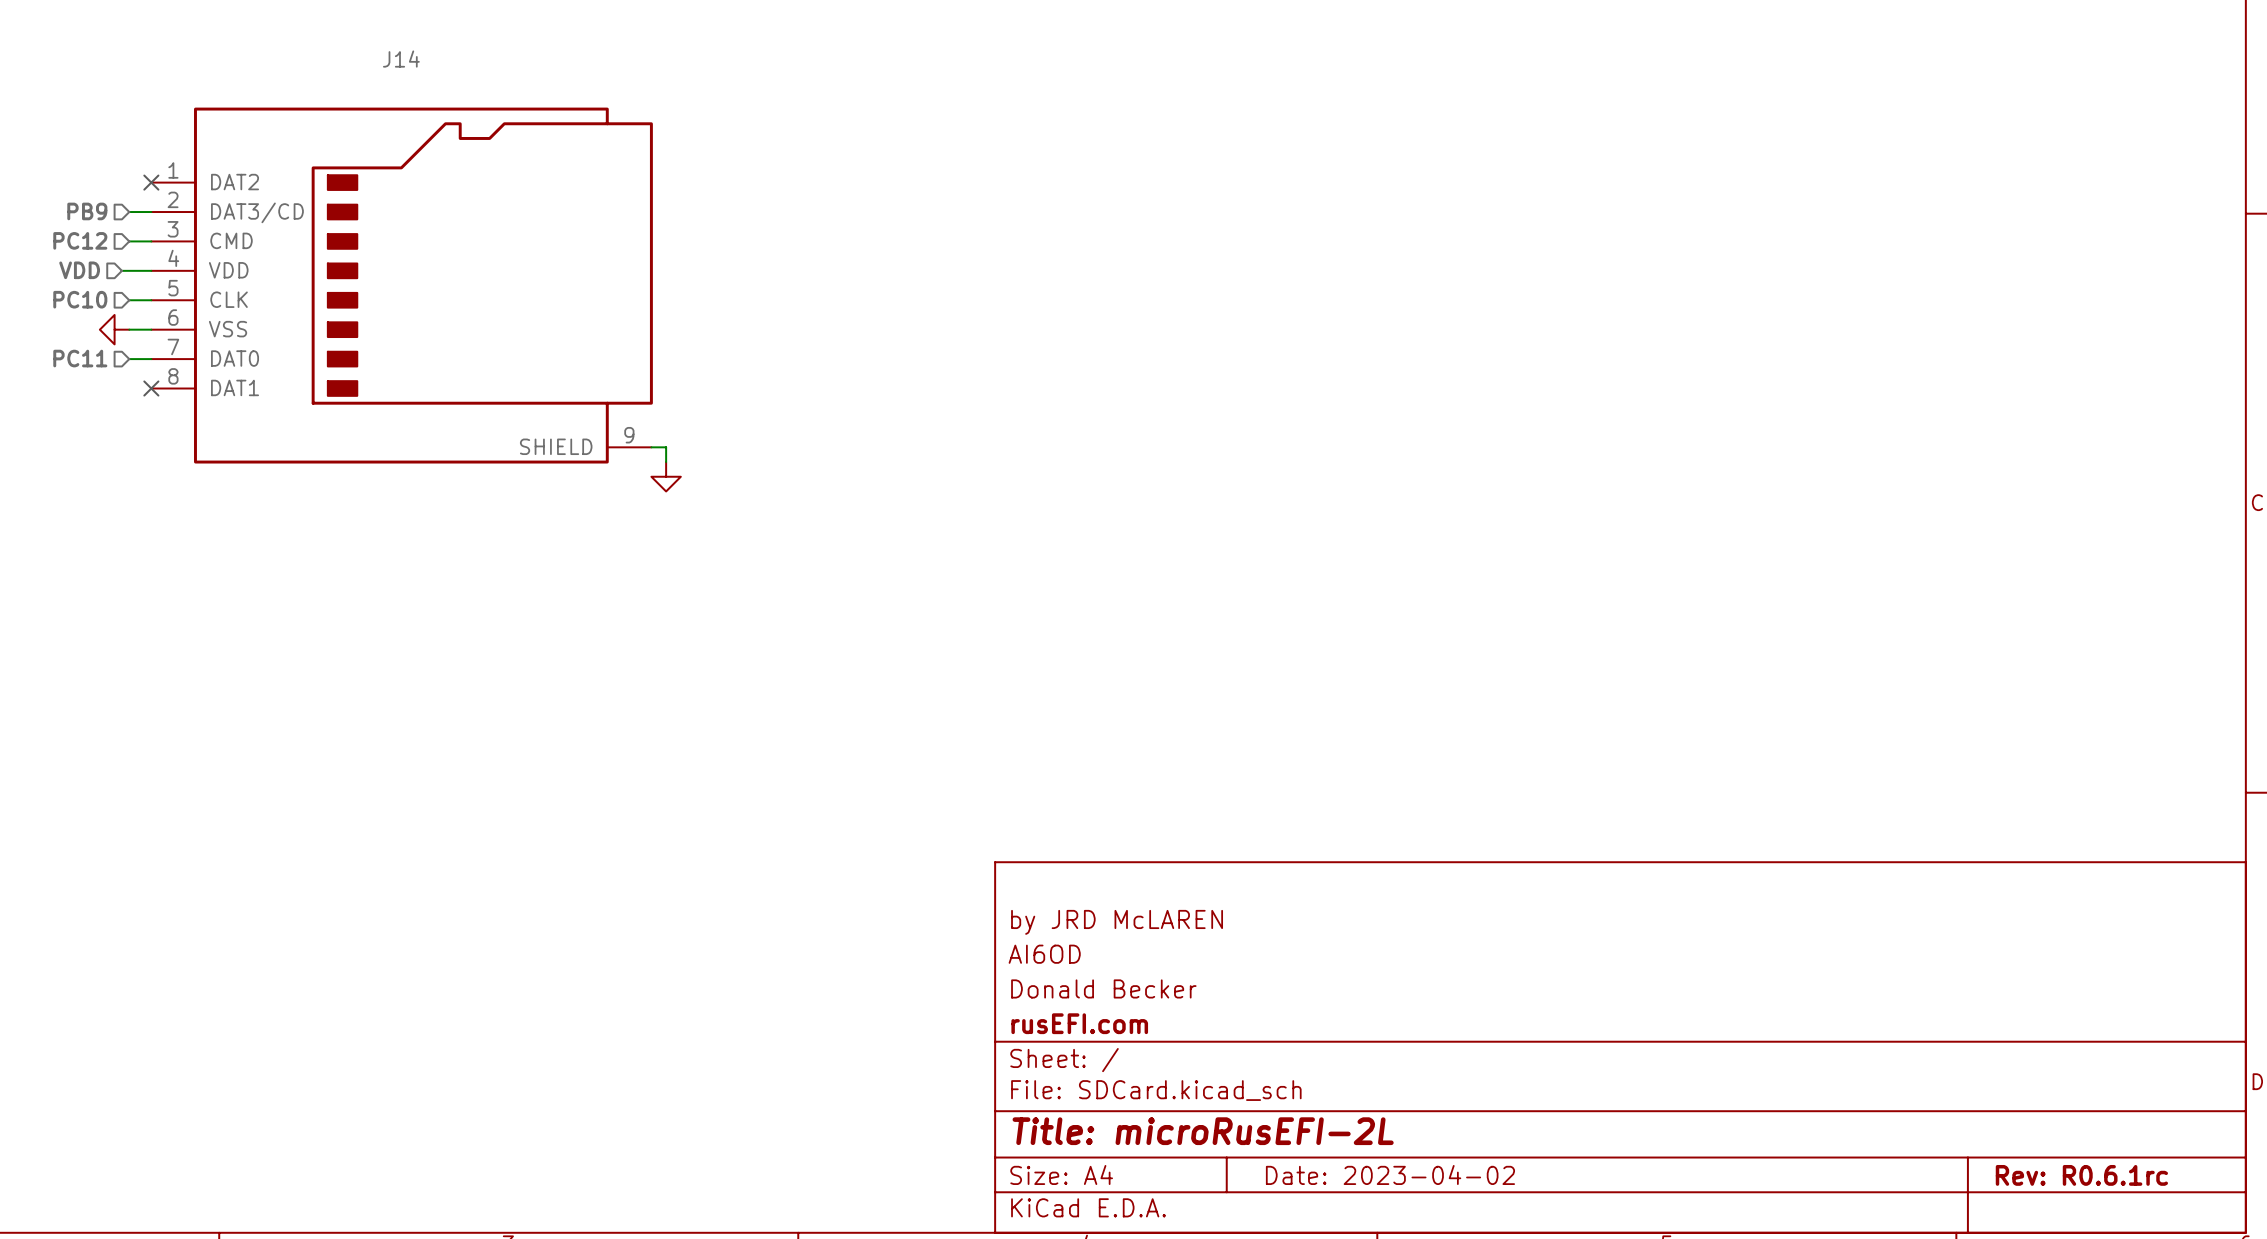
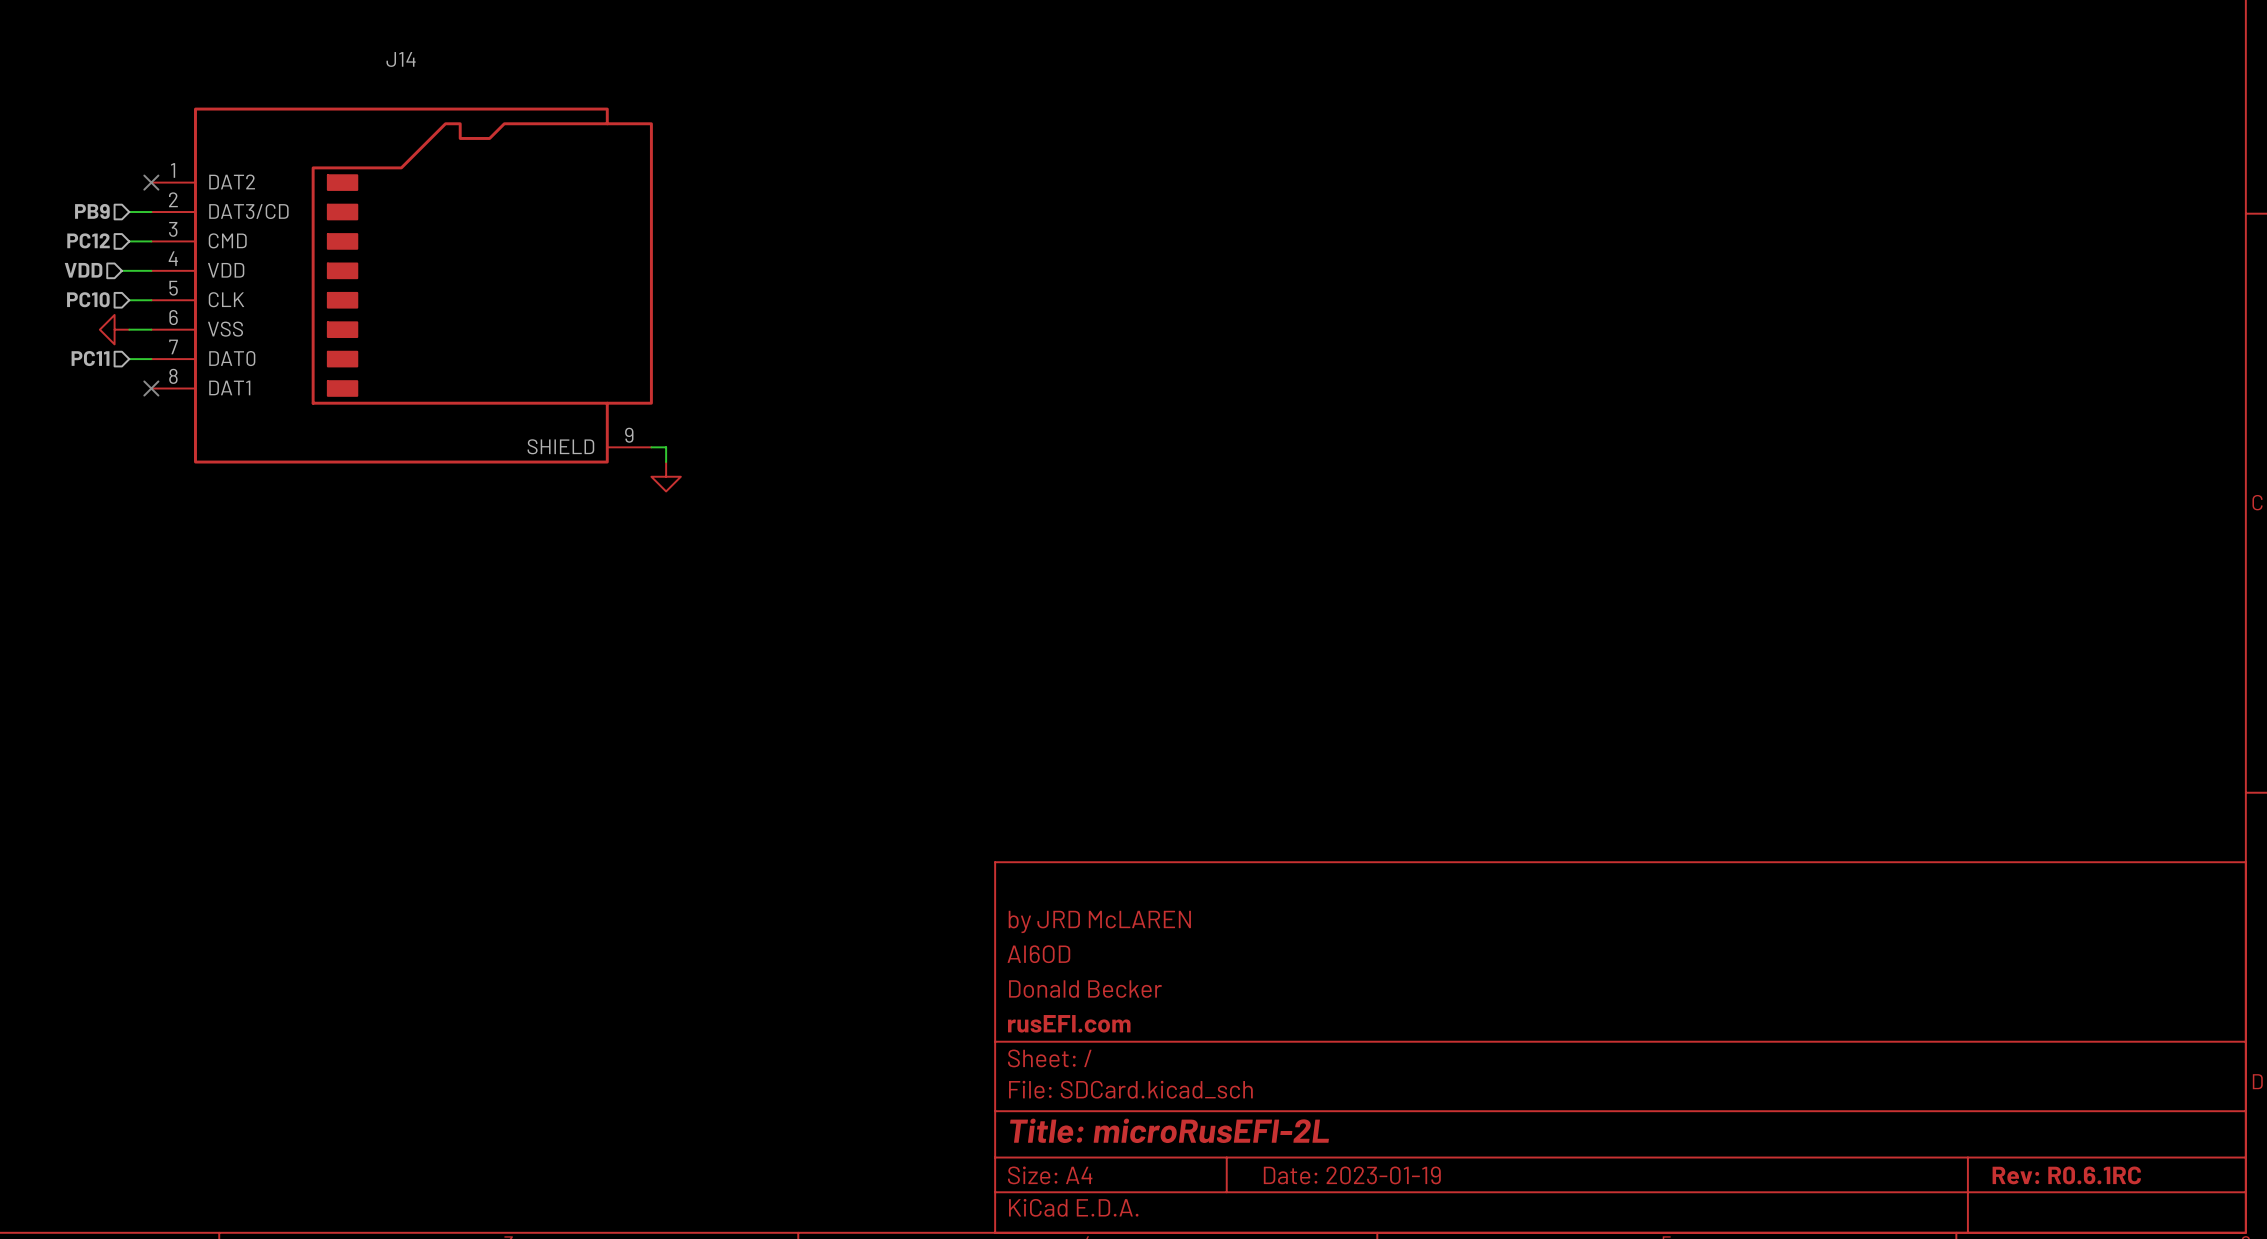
title block: Date: 2023-04-02 (1390, 1174) -> Date: 2023-01-19 (1352, 1175)
title block: Rev: R0.6.1rc (2081, 1175) -> Rev: R0.6.1RC (2066, 1175)

